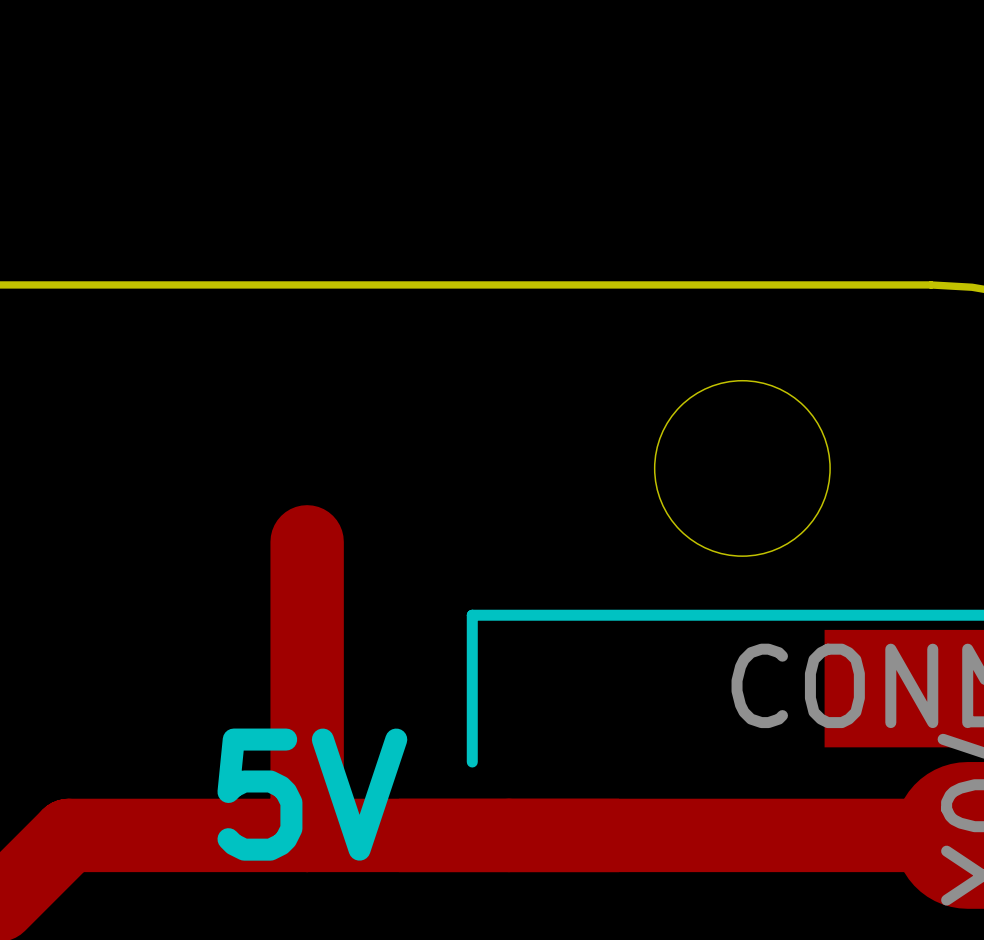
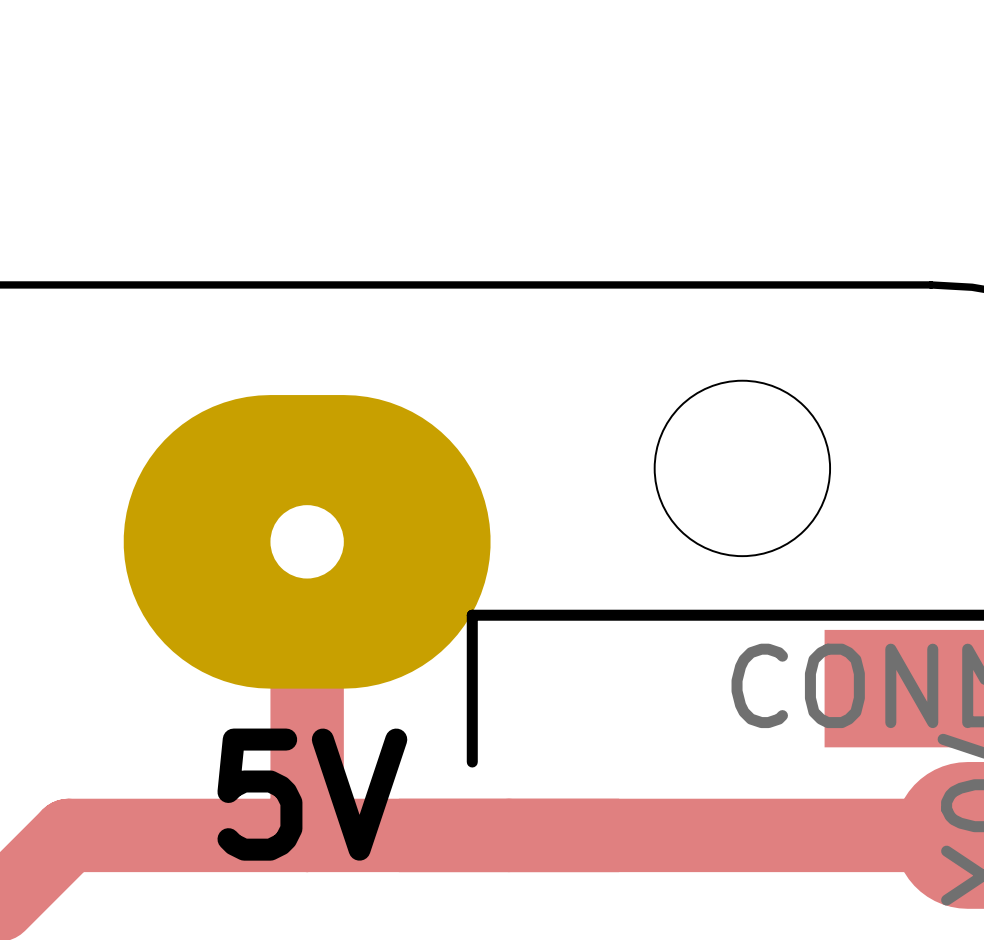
part: none -> (307, 541)

